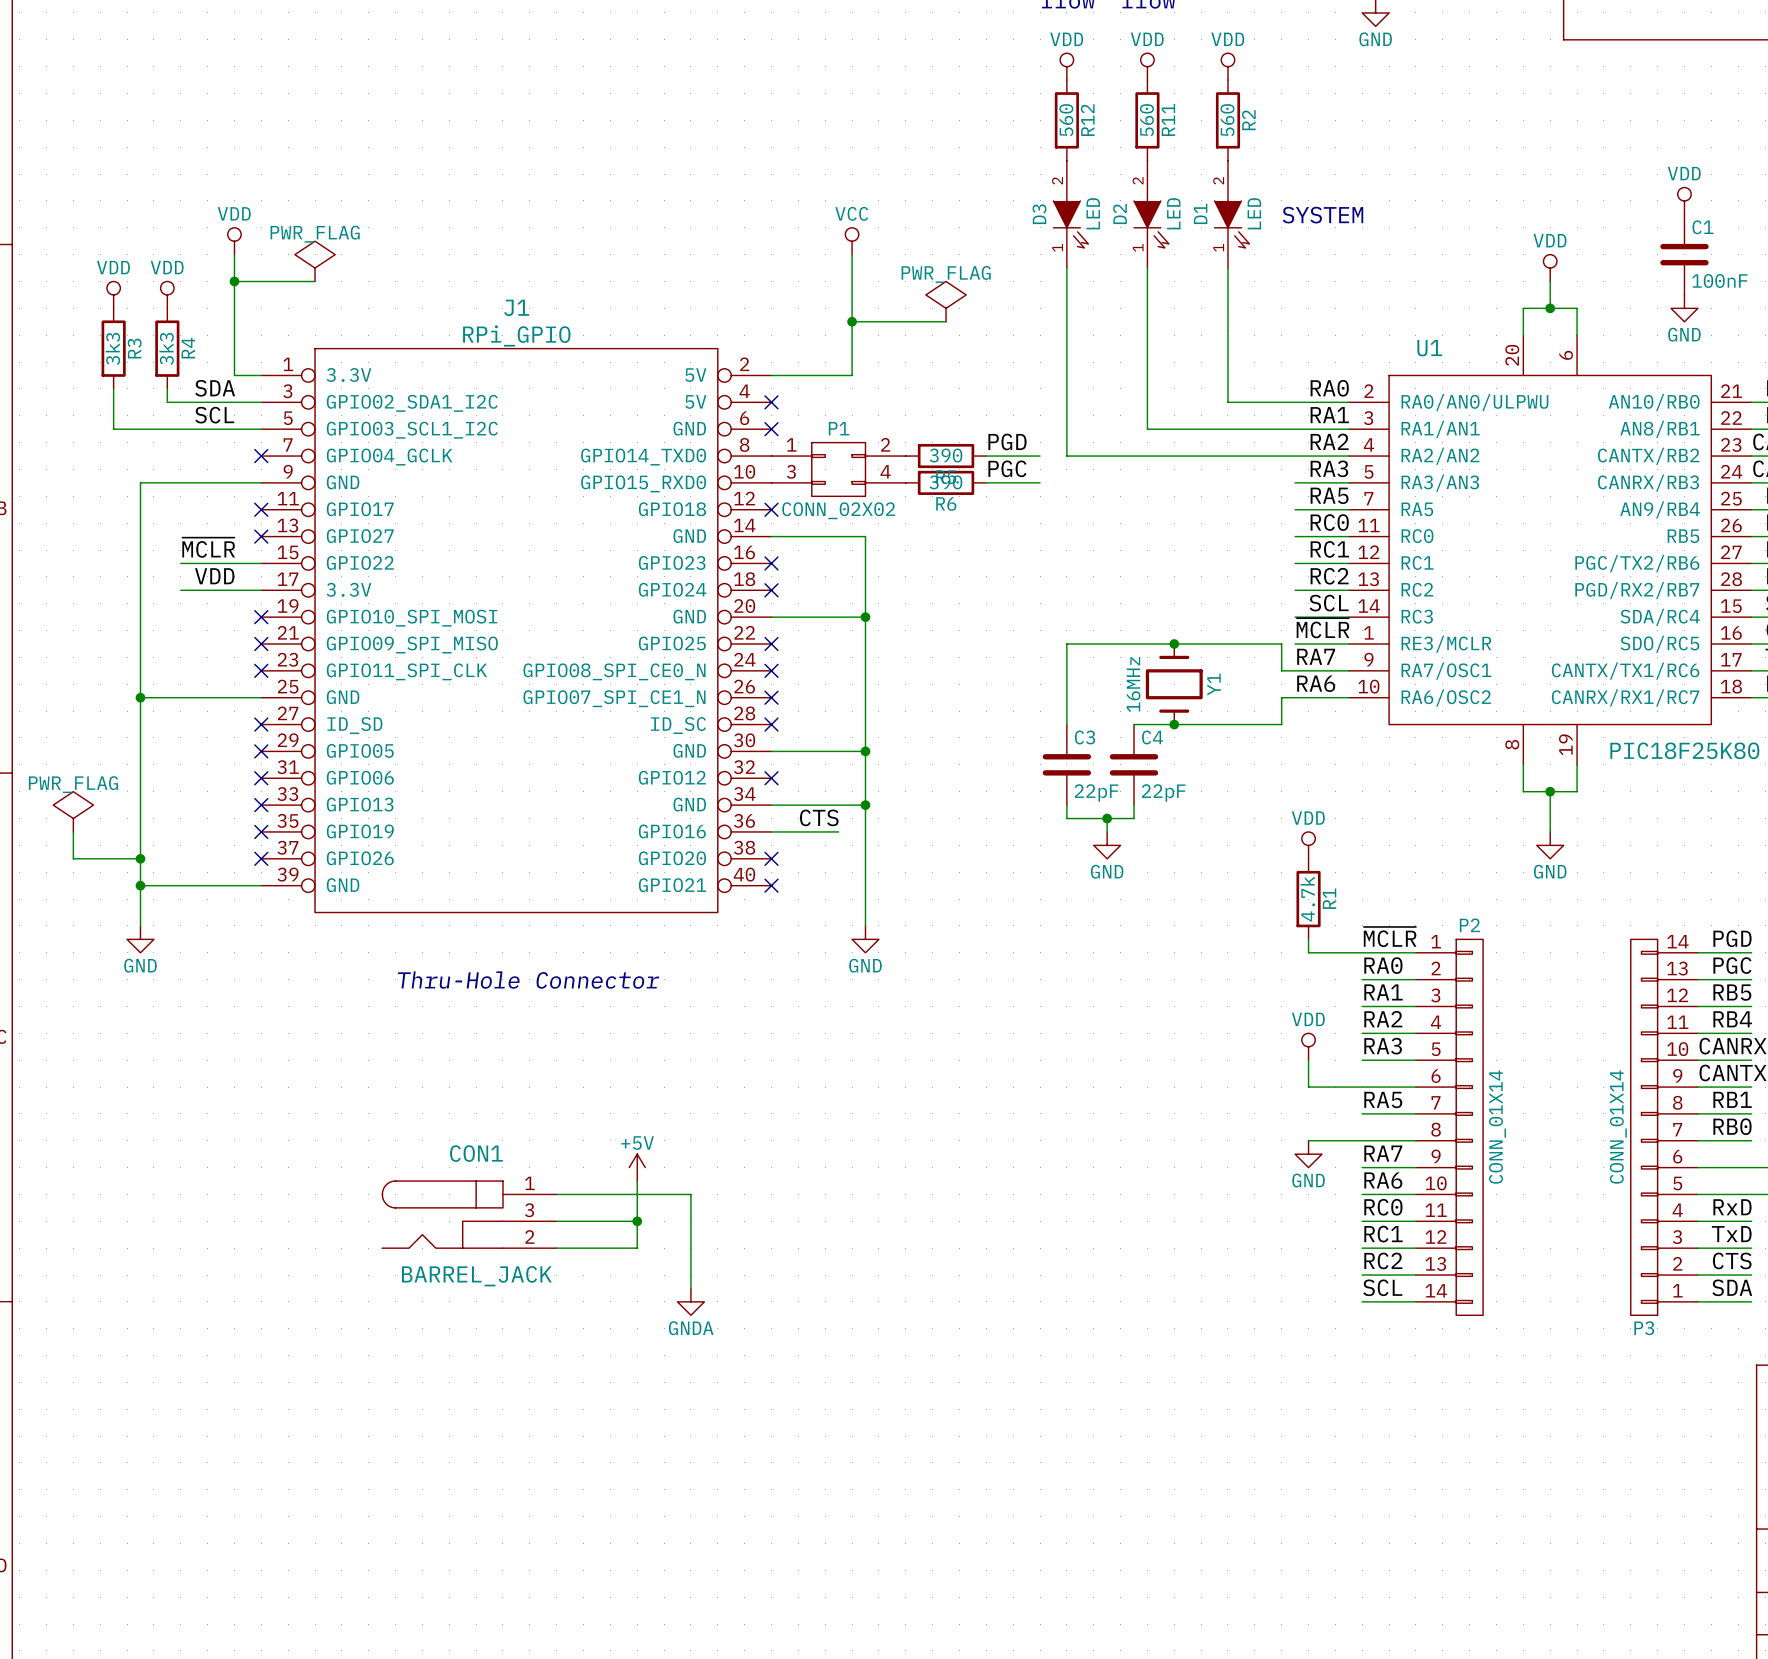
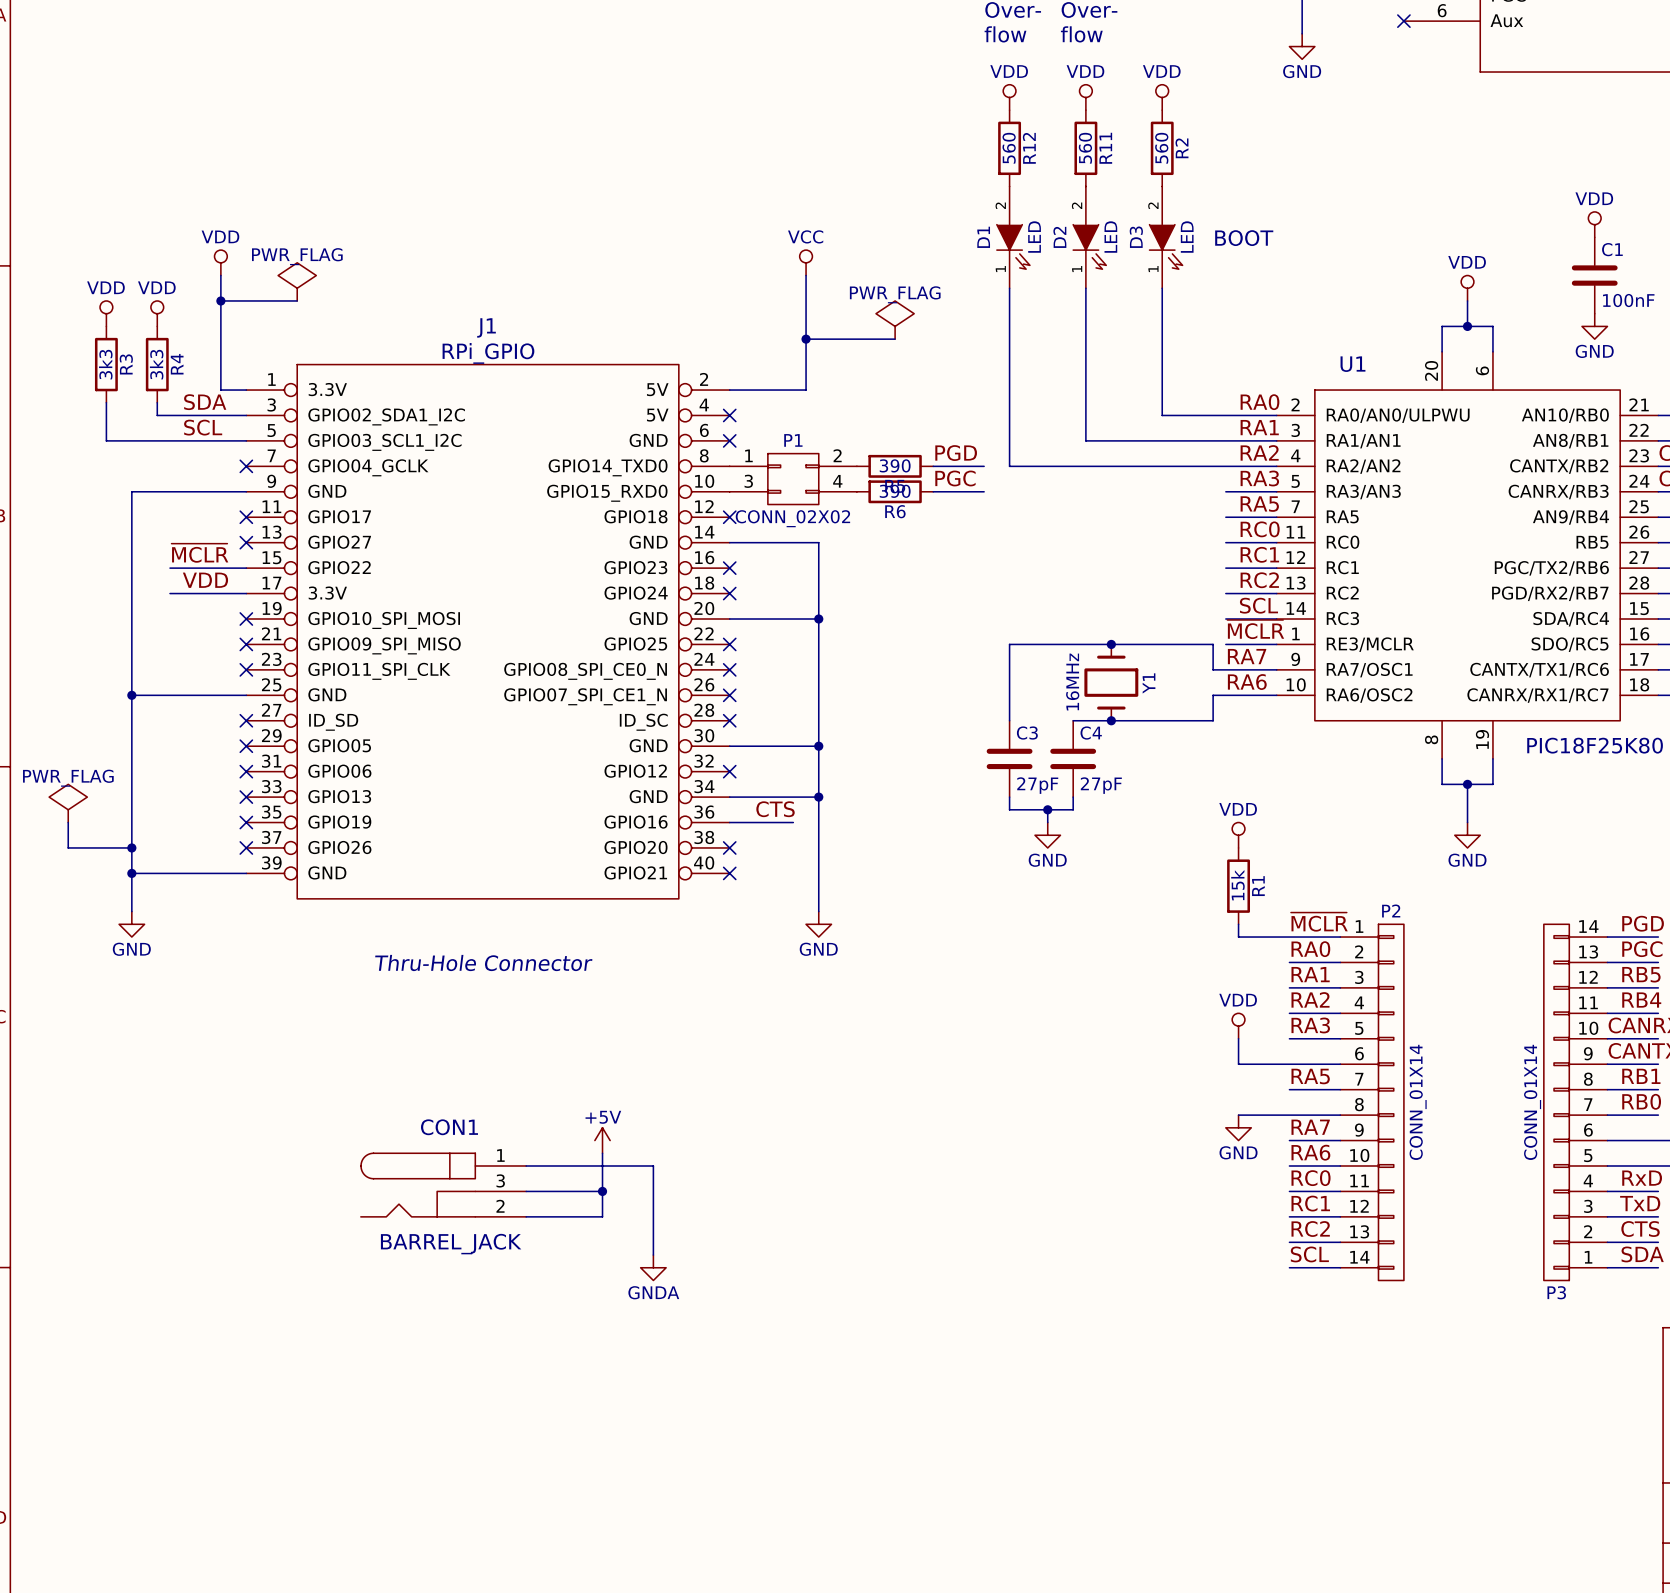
D1 name: D1 (1200, 213) -> D3 (1136, 237)
D3 name: D3 (1039, 214) -> D1 (983, 237)
text: SYSTEM (1322, 215) -> BOOT (1244, 238)
C3 value: 22pF (1096, 792) -> 27pF (1037, 785)
C4 value: 22pF (1163, 792) -> 27pF (1101, 785)
R1 value: 4.7k (1307, 899) -> 15k (1237, 885)

